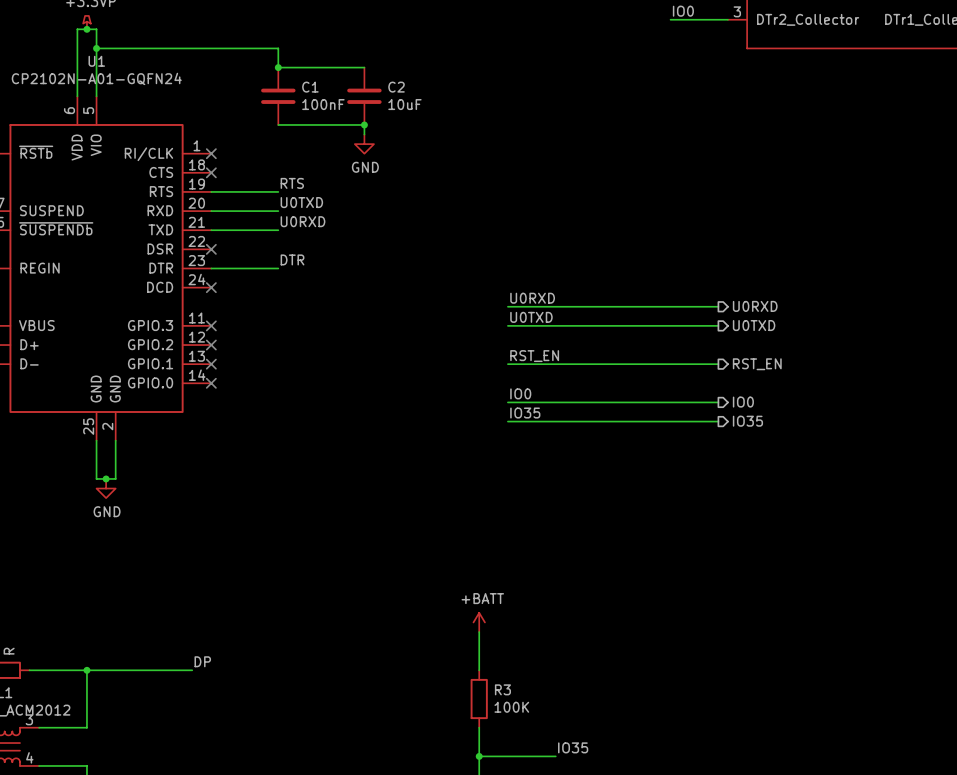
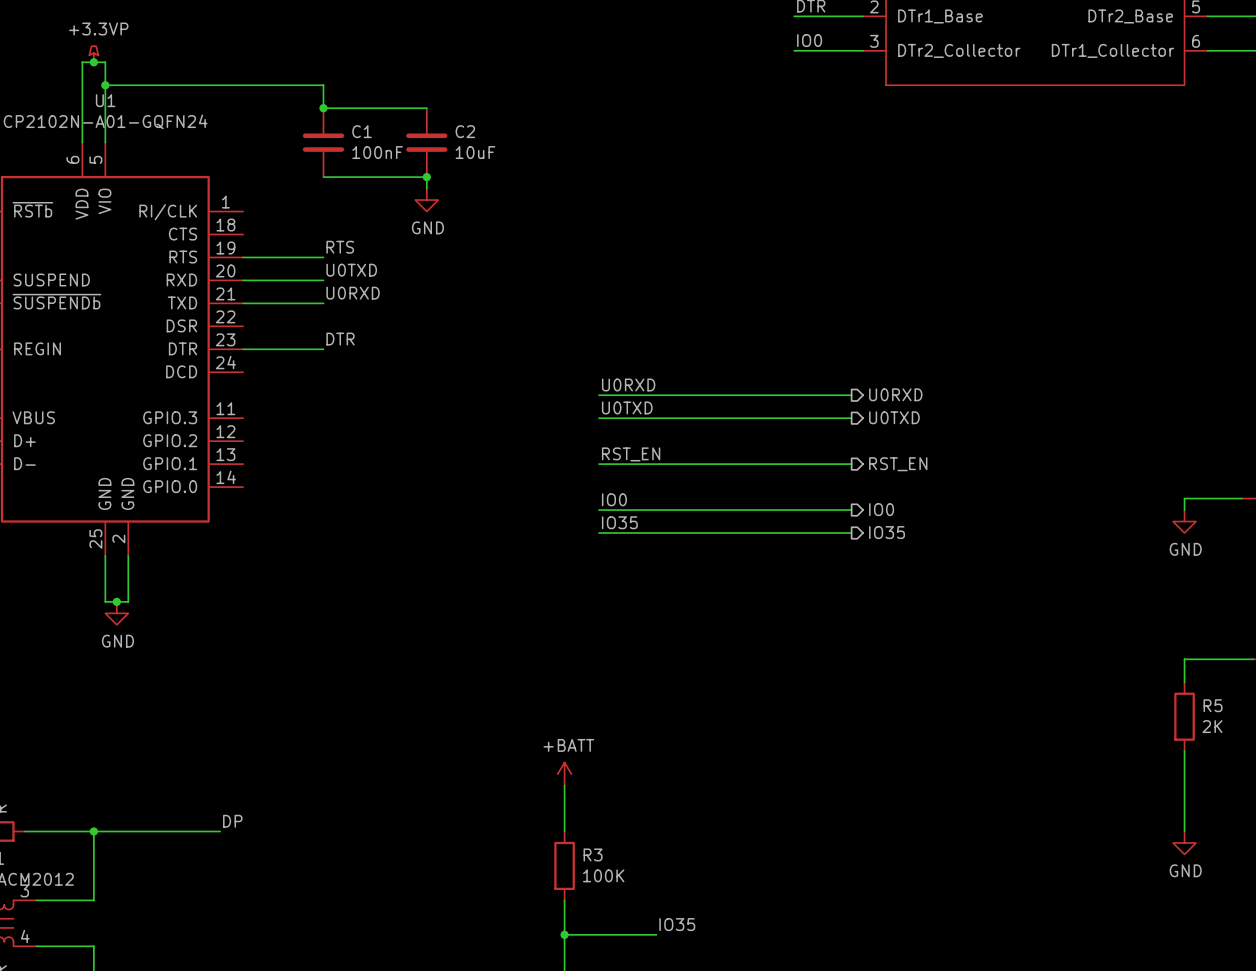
no-connect mark: (211, 153) -> none
no-connect mark: (211, 172) -> none
no-connect mark: (211, 249) -> none
no-connect mark: (211, 287) -> none
no-connect mark: (211, 325) -> none
no-connect mark: (211, 345) -> none
no-connect mark: (211, 364) -> none
no-connect mark: (211, 383) -> none

